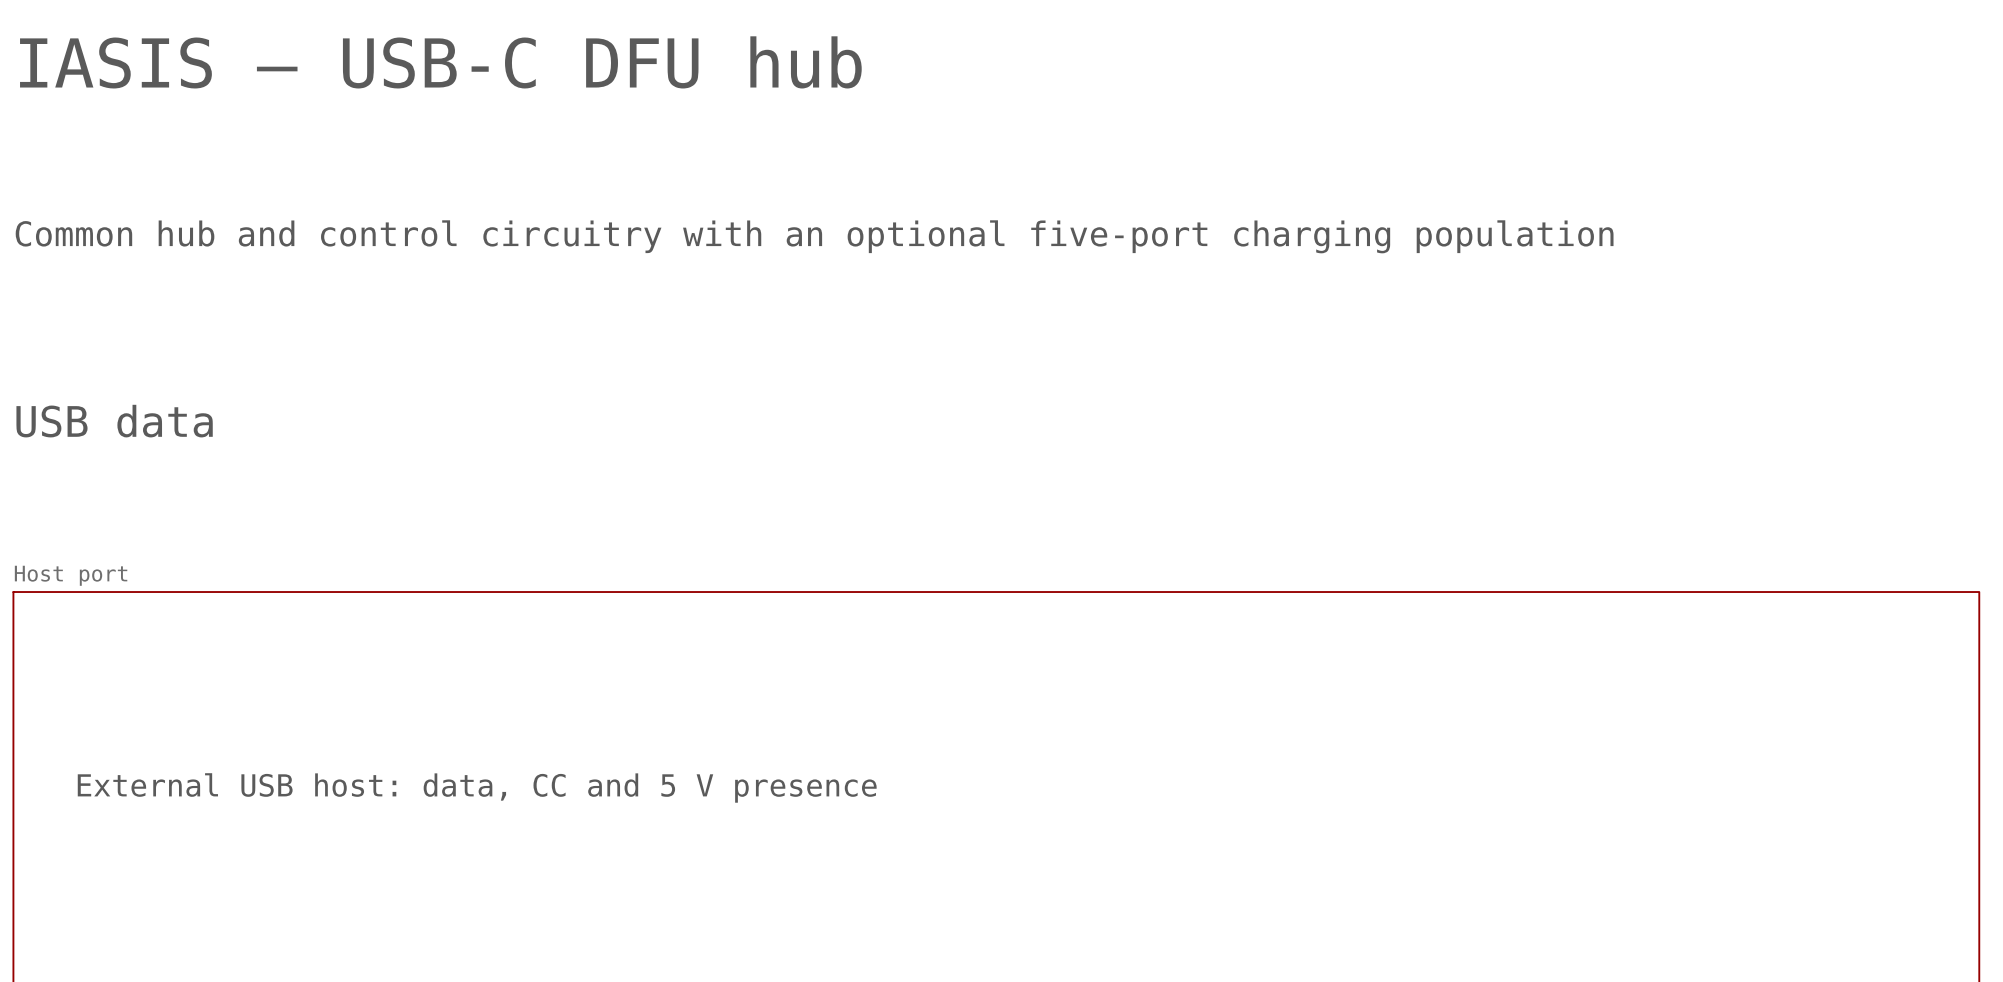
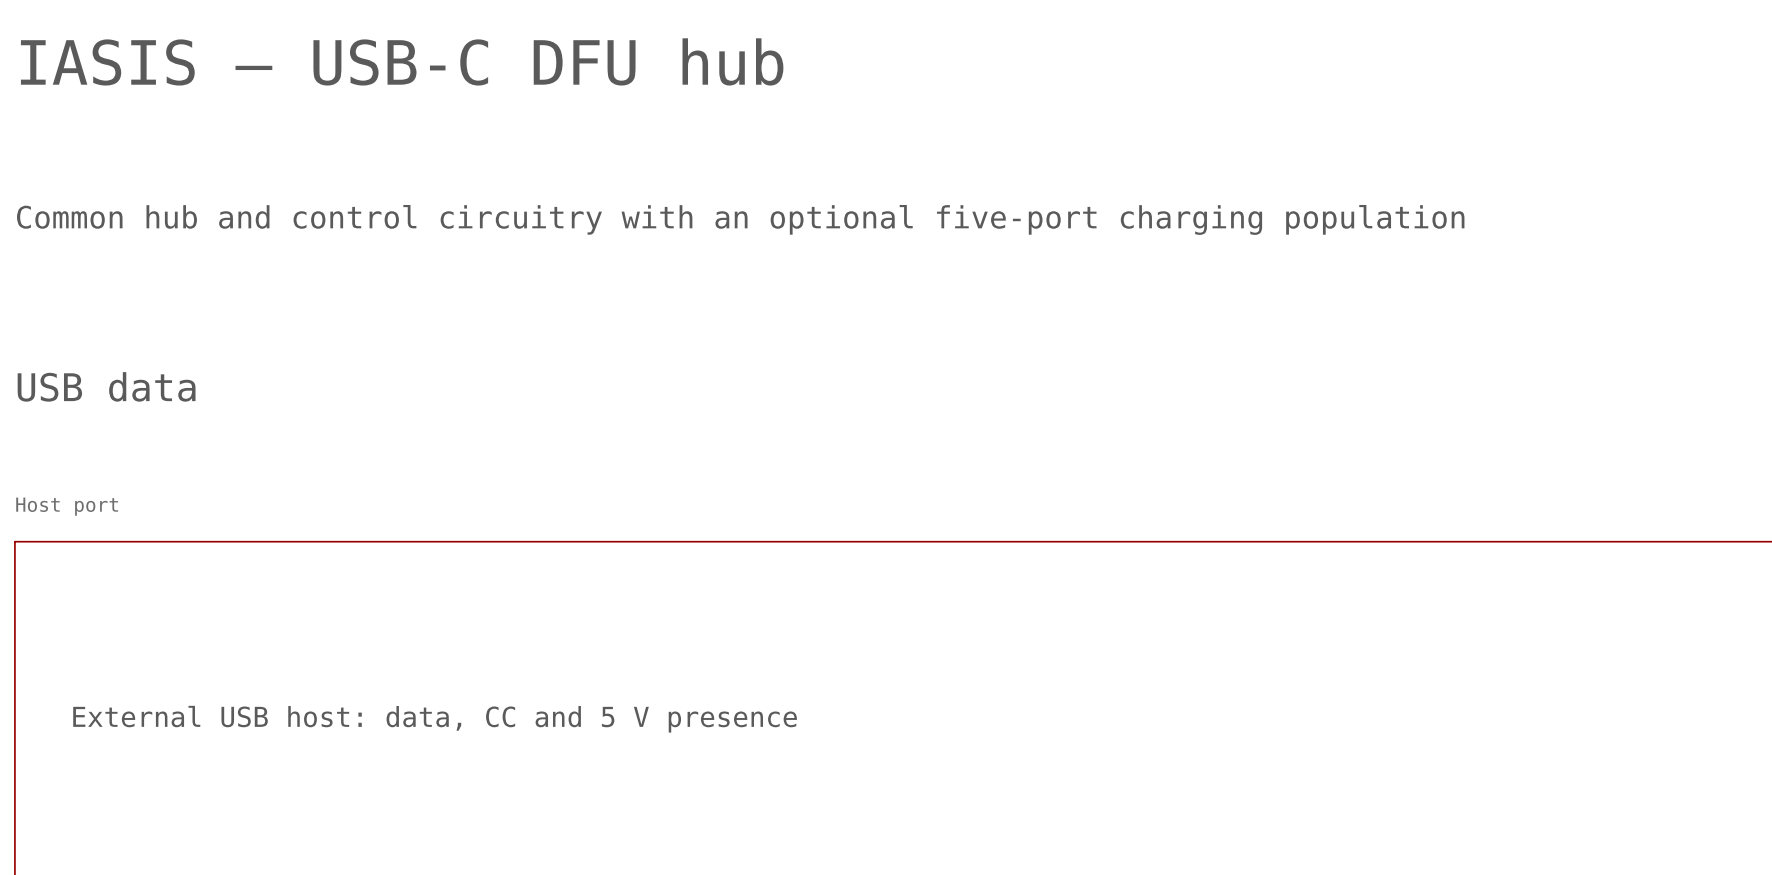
sheet Host port name position: Host port (71, 575) -> Host port (67, 506)

